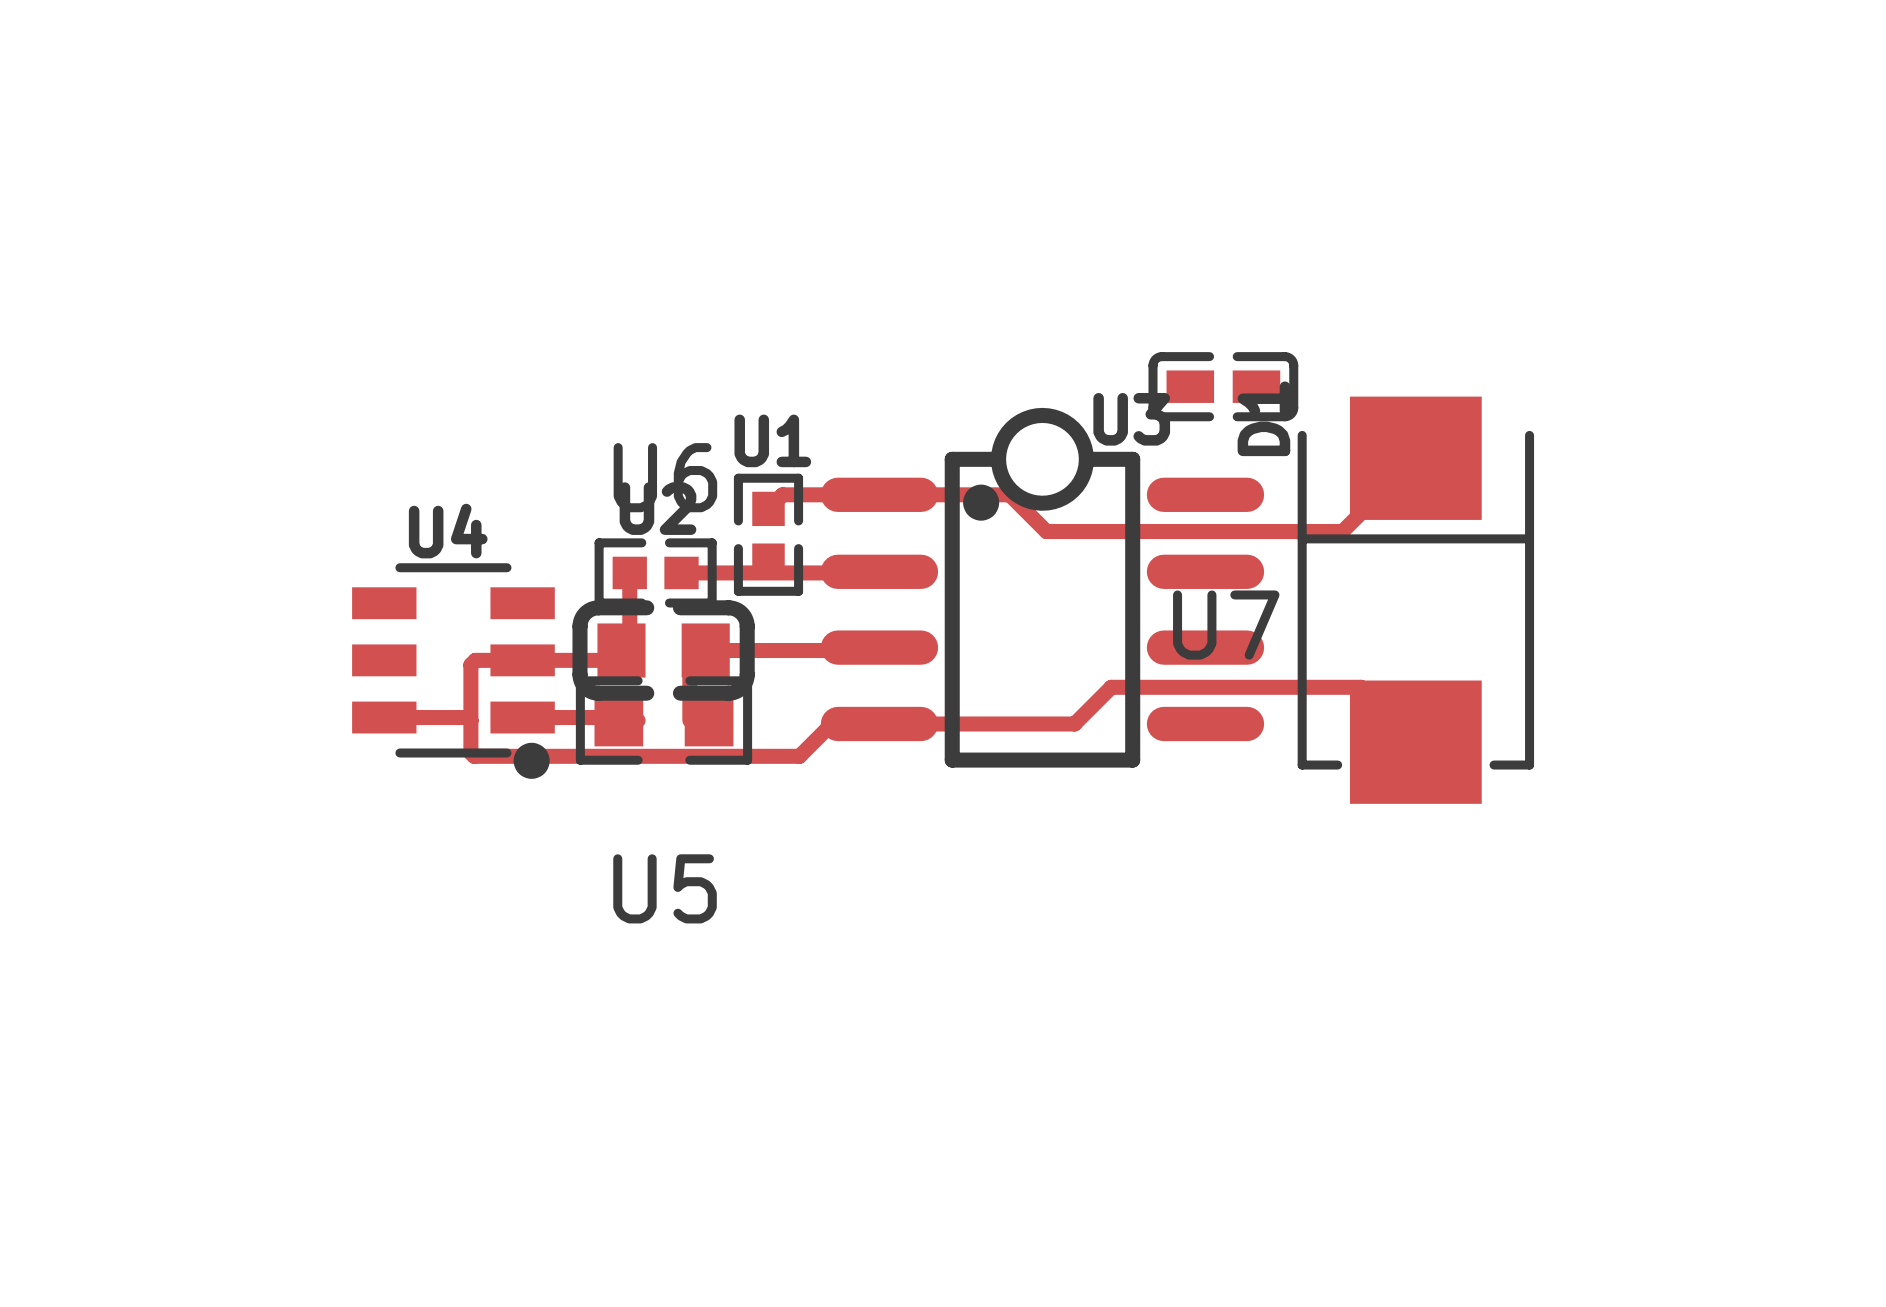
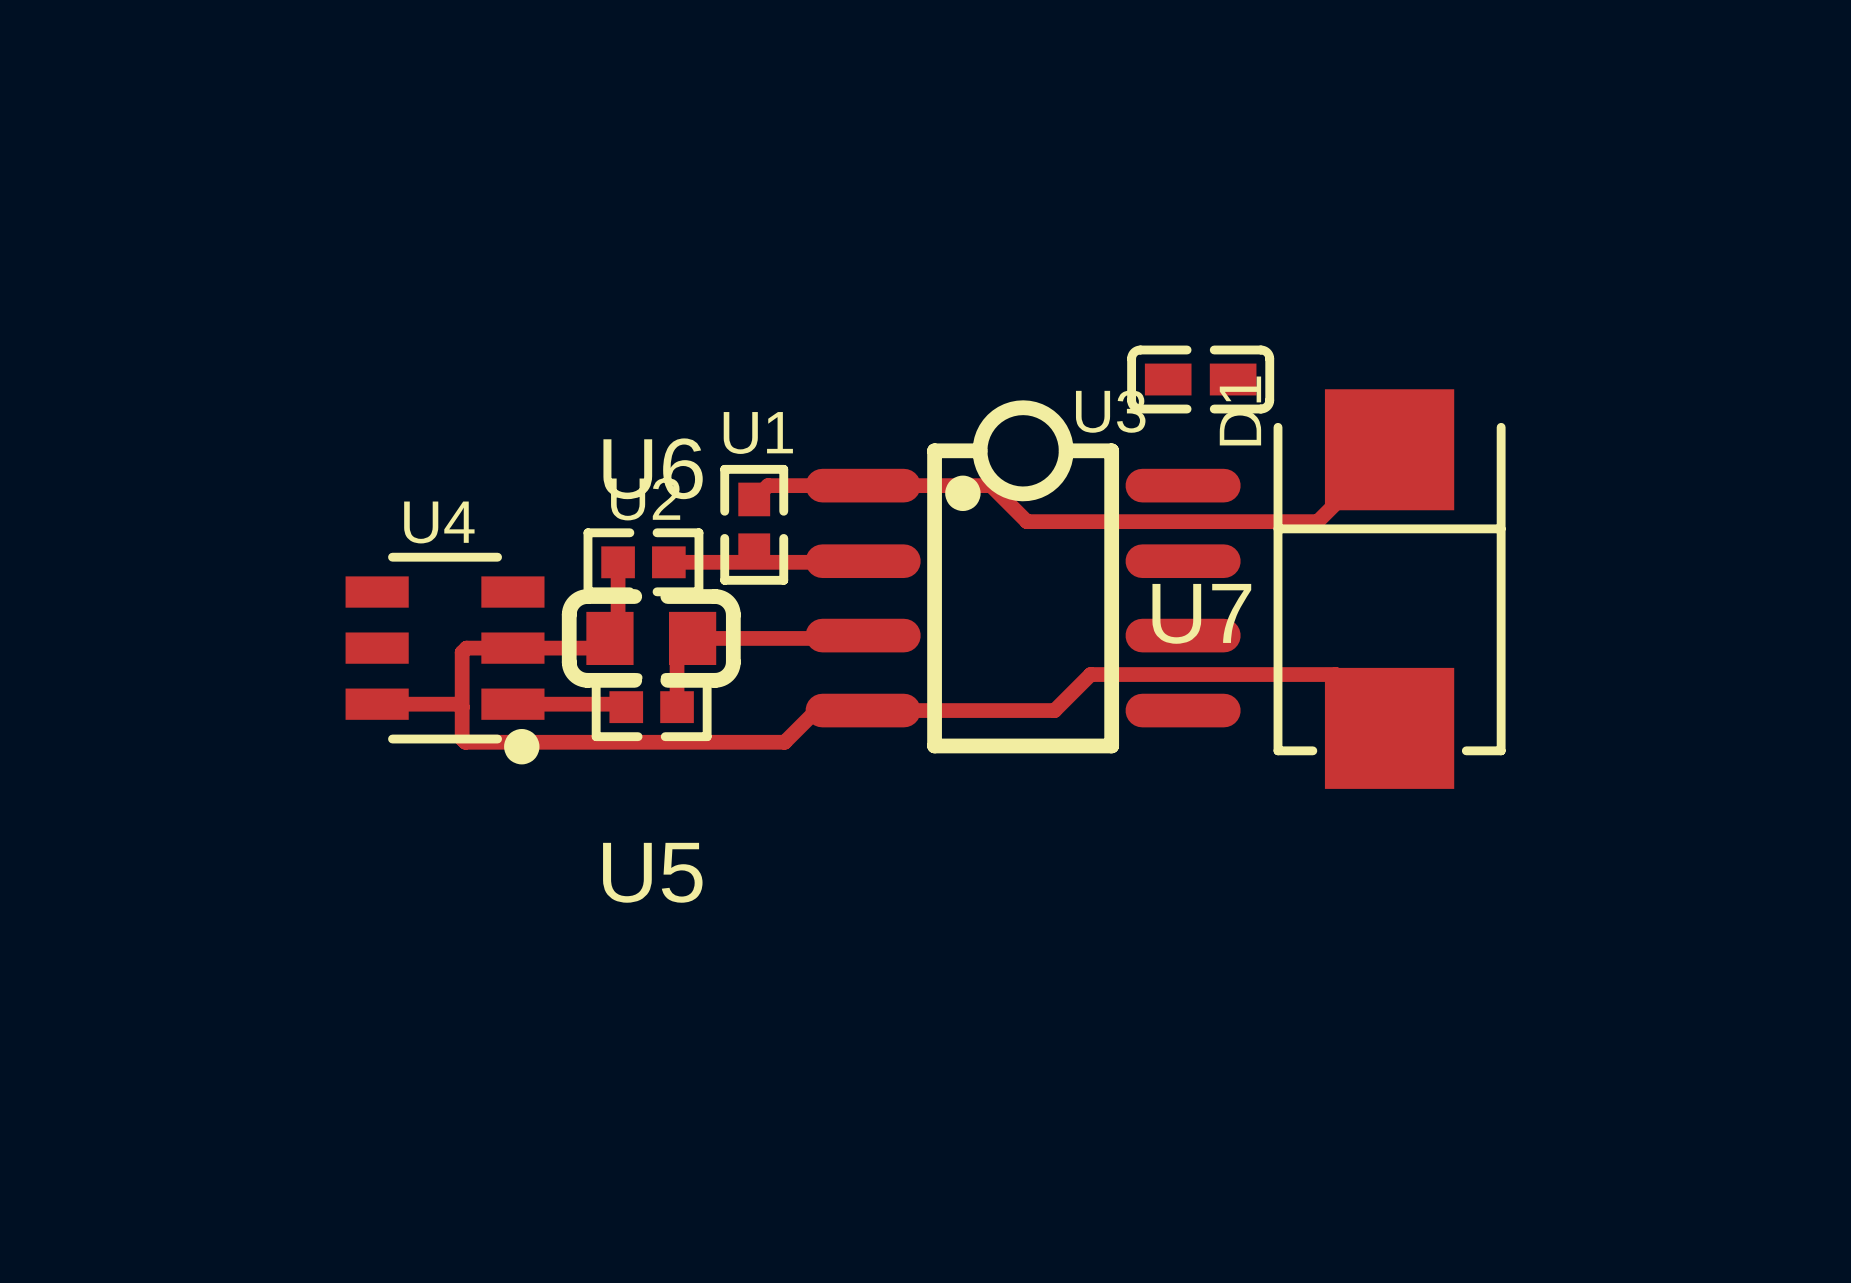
U6 footprint: [575, 676, 753, 765] -> [591, 673, 712, 742]

